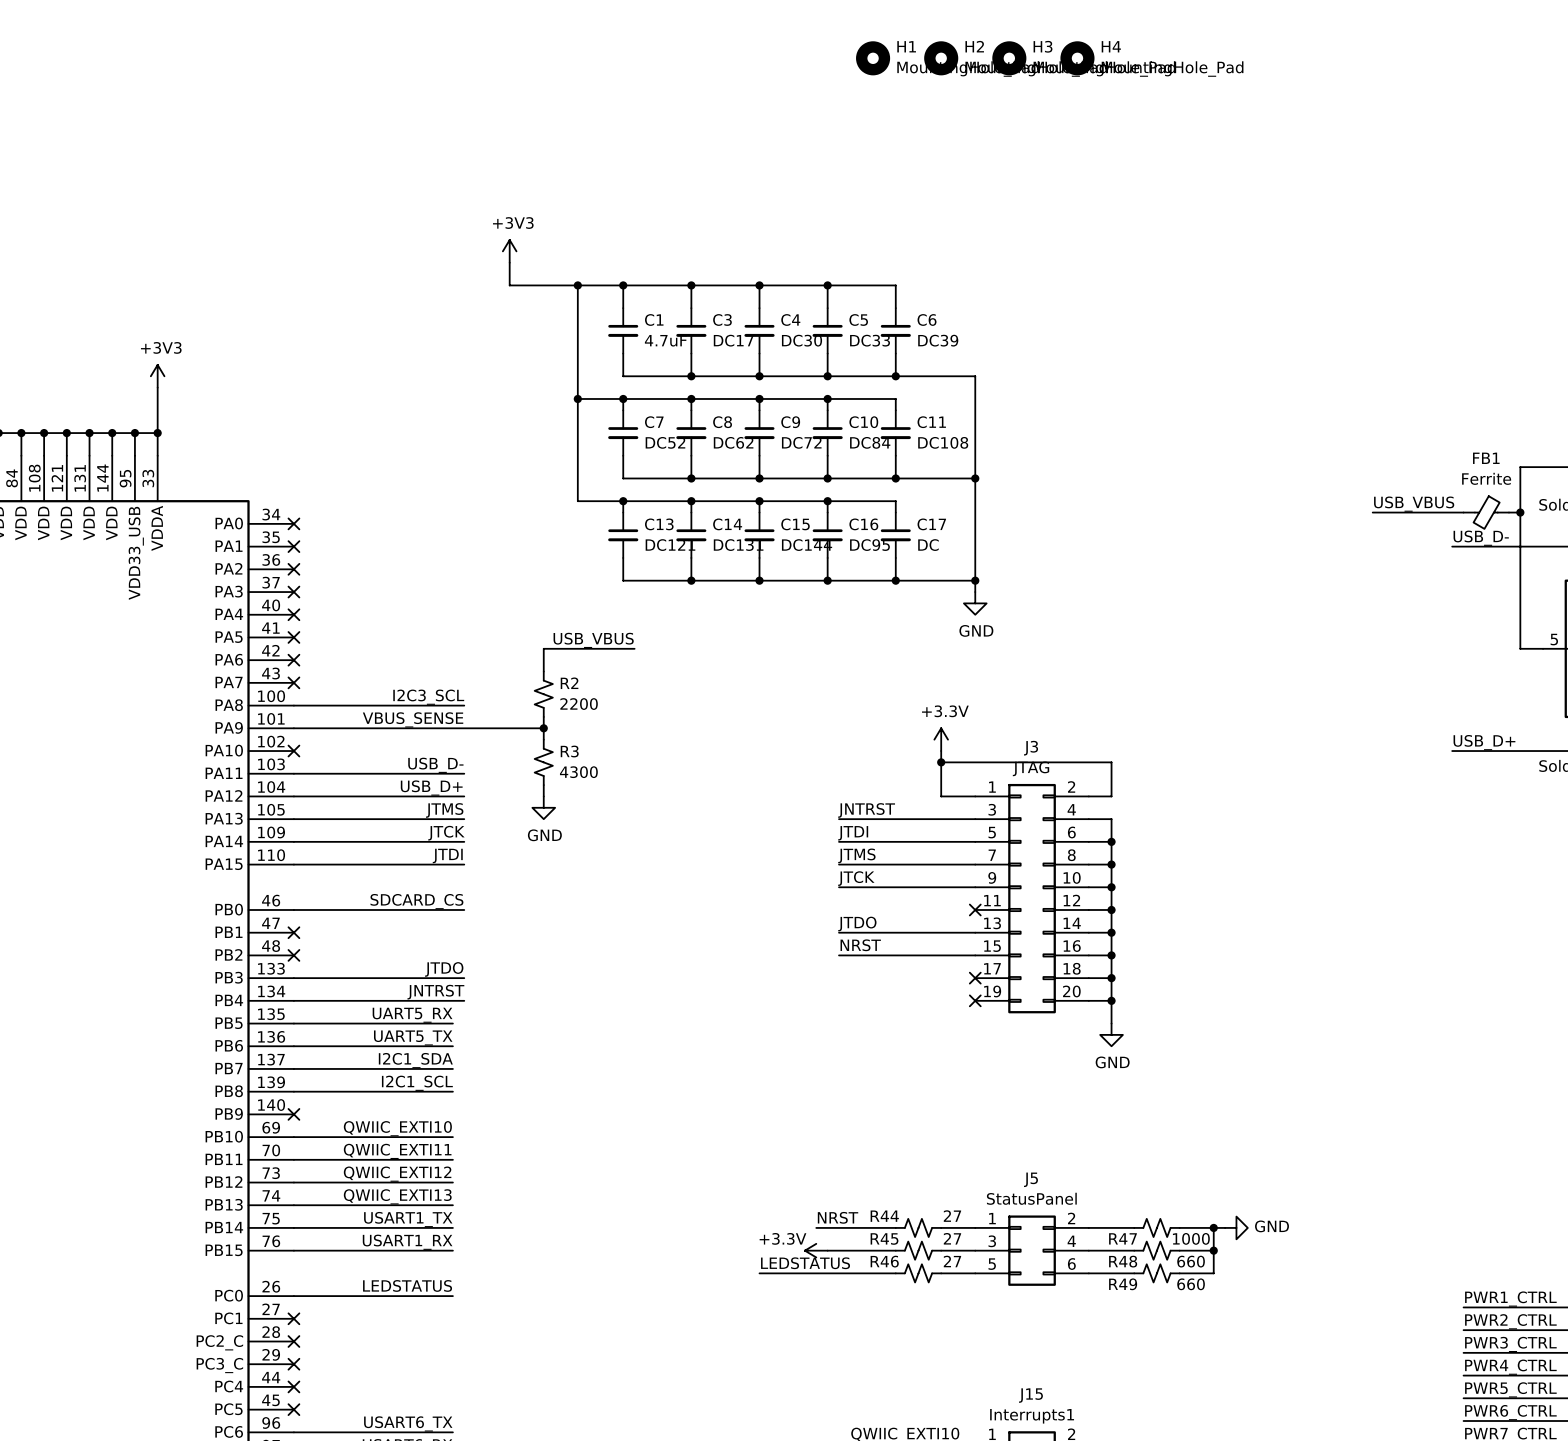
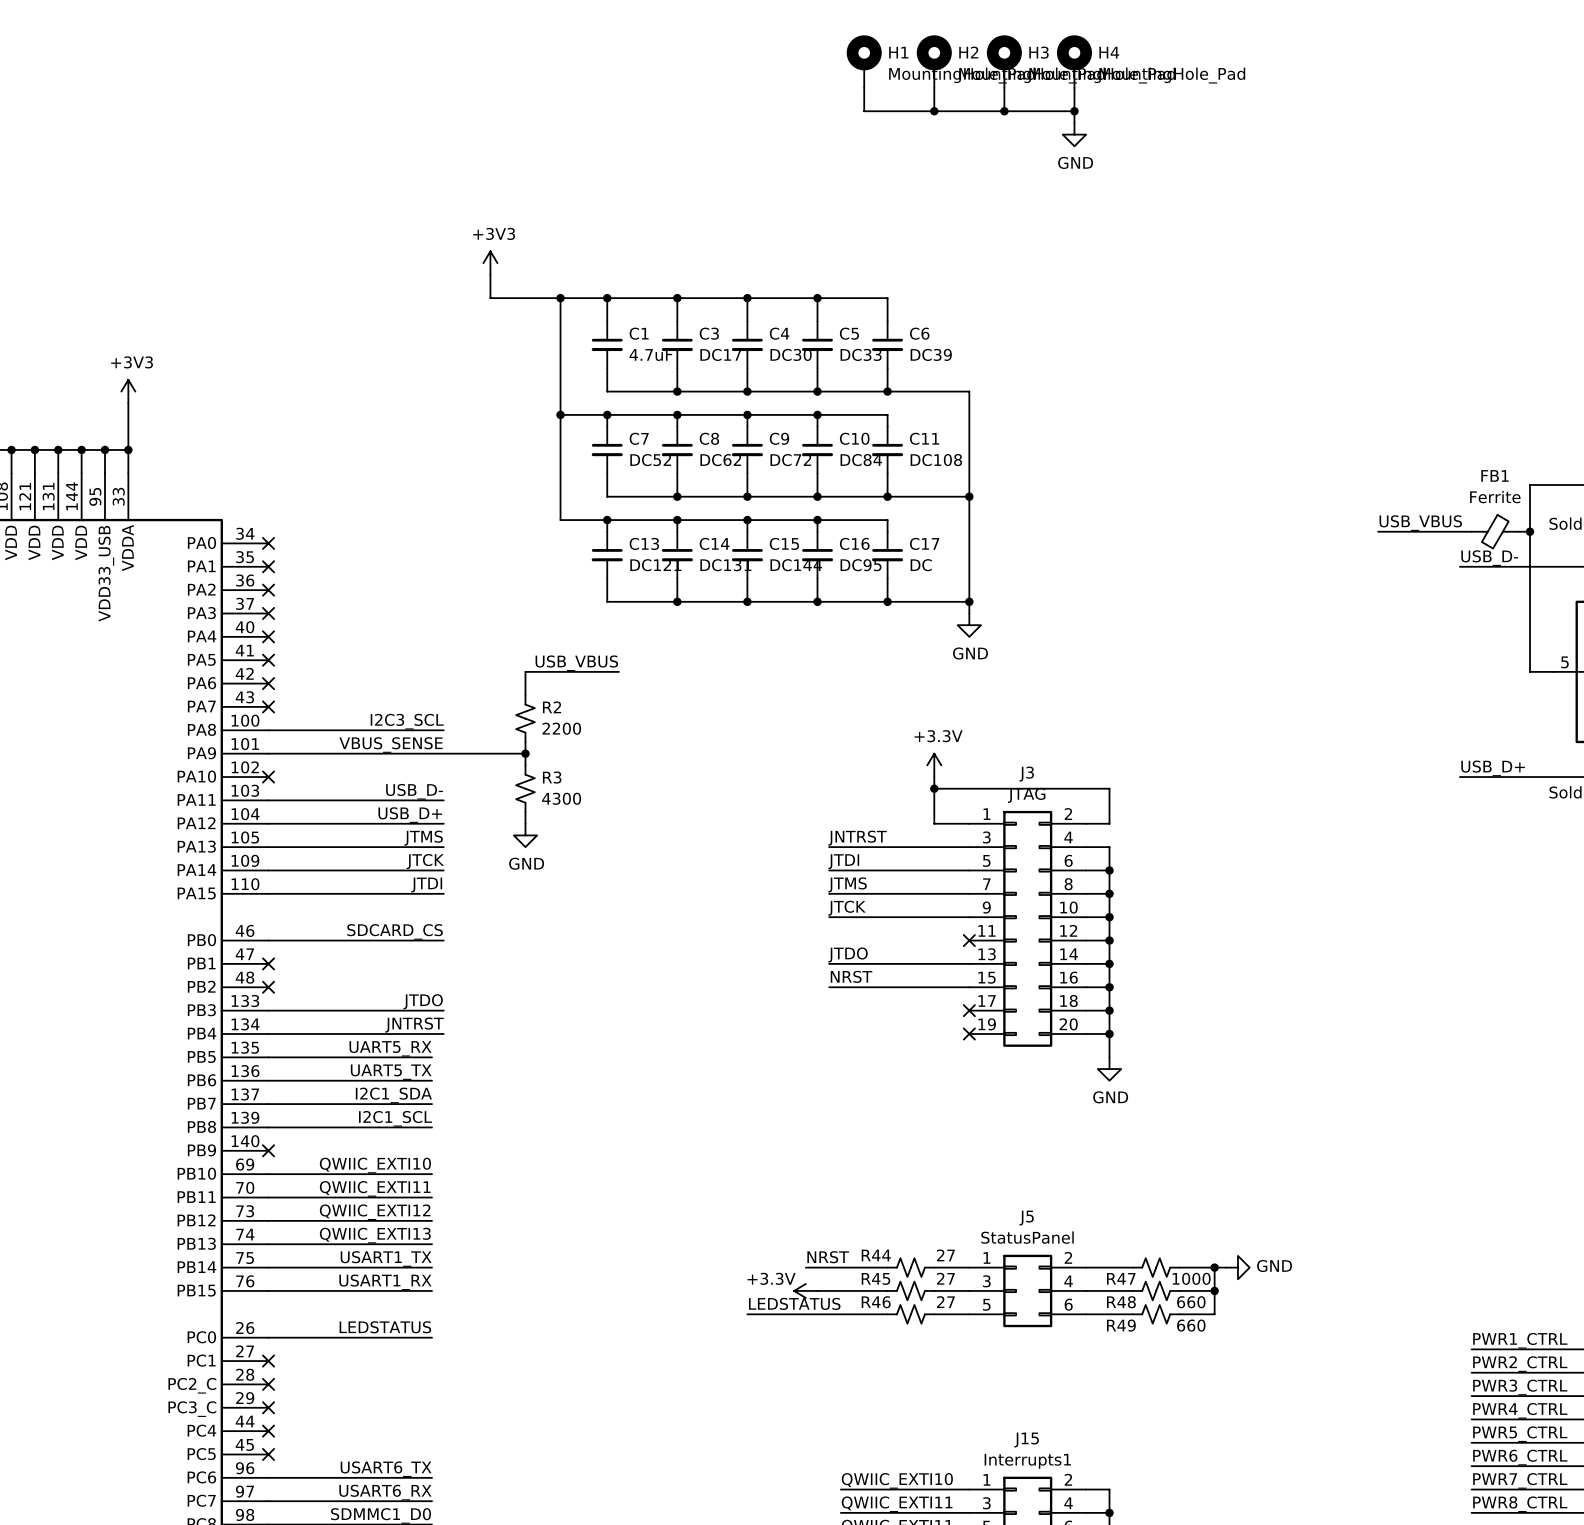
H1 symbol: [856, 41, 891, 76] -> [846, 35, 882, 88]
H2 symbol: [924, 41, 959, 76] -> [916, 35, 952, 88]
H3 symbol: [992, 41, 1027, 76] -> [986, 35, 1022, 88]
H4 symbol: [1060, 41, 1095, 76] -> [1056, 35, 1092, 88]
wire: none -> (864, 87) (864, 111) (1074, 111)
wire: none -> (934, 87) (934, 111)
wire: none -> (1004, 87) (1004, 111)
wire: none -> (1074, 87) (1074, 122)
junction: none -> (934, 111)
junction: none -> (1004, 111)
junction: none -> (1074, 111)
power symbol: none -> GND (1074, 134)

